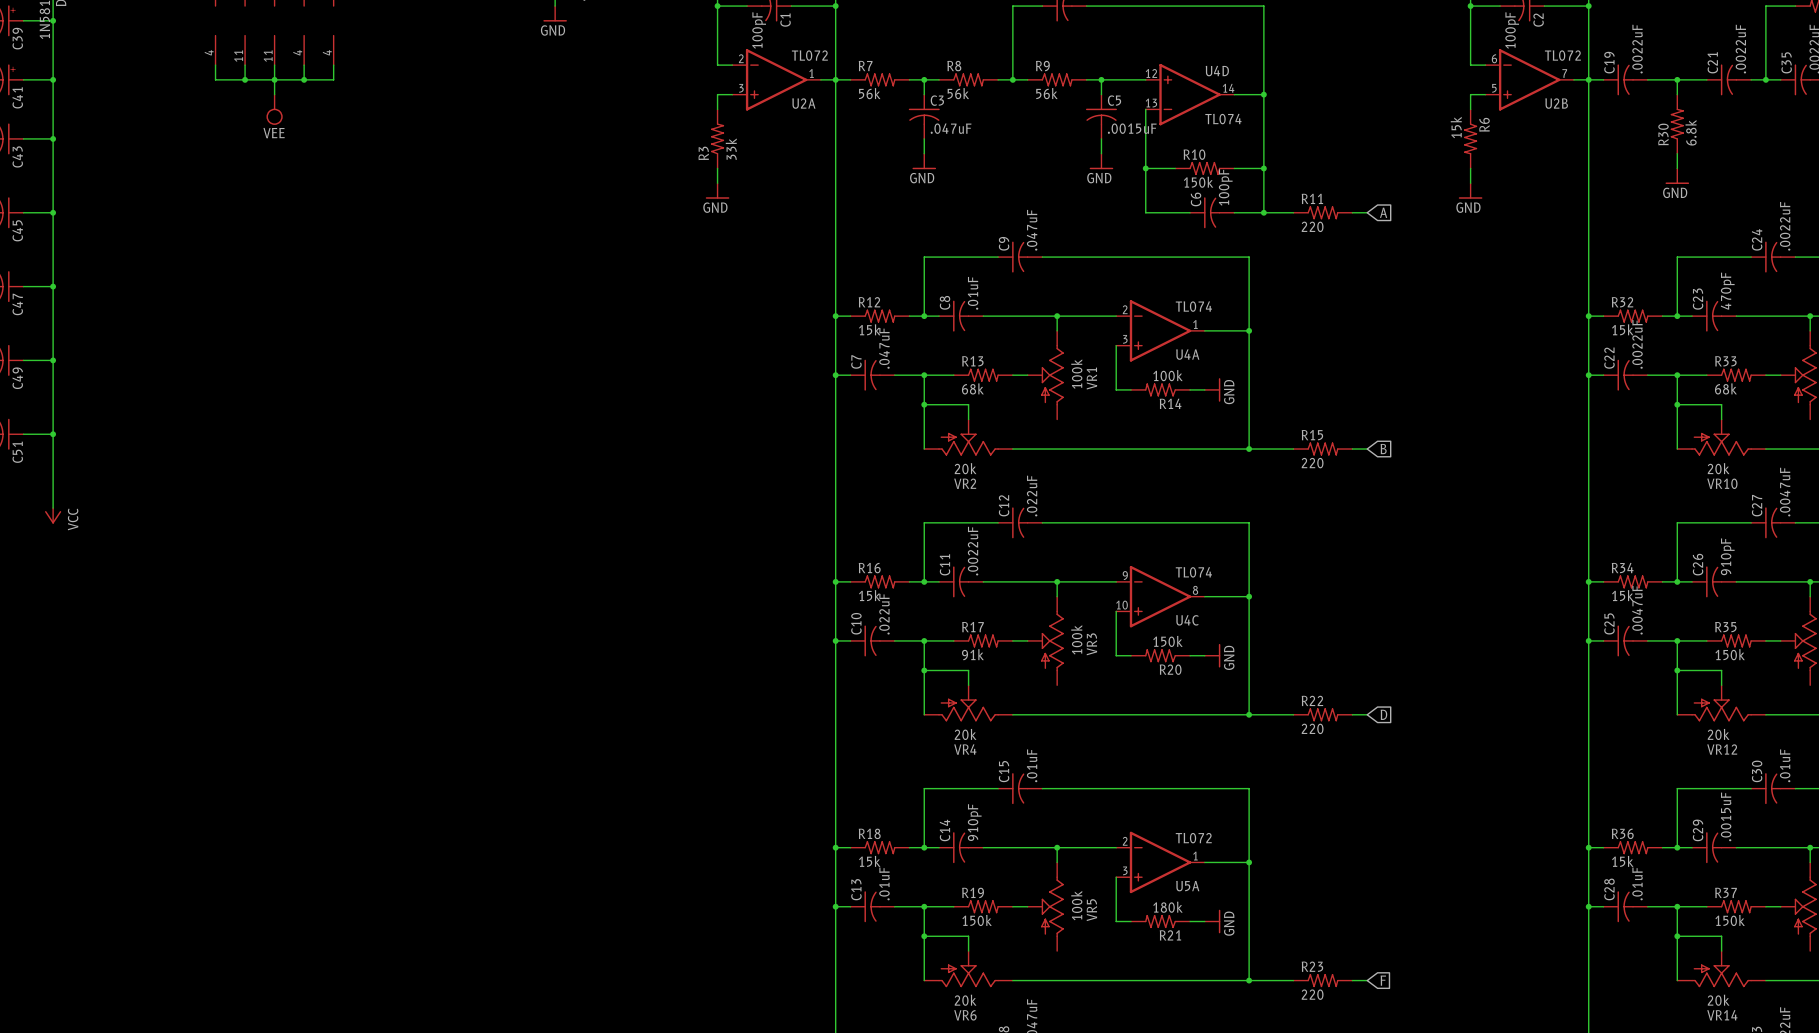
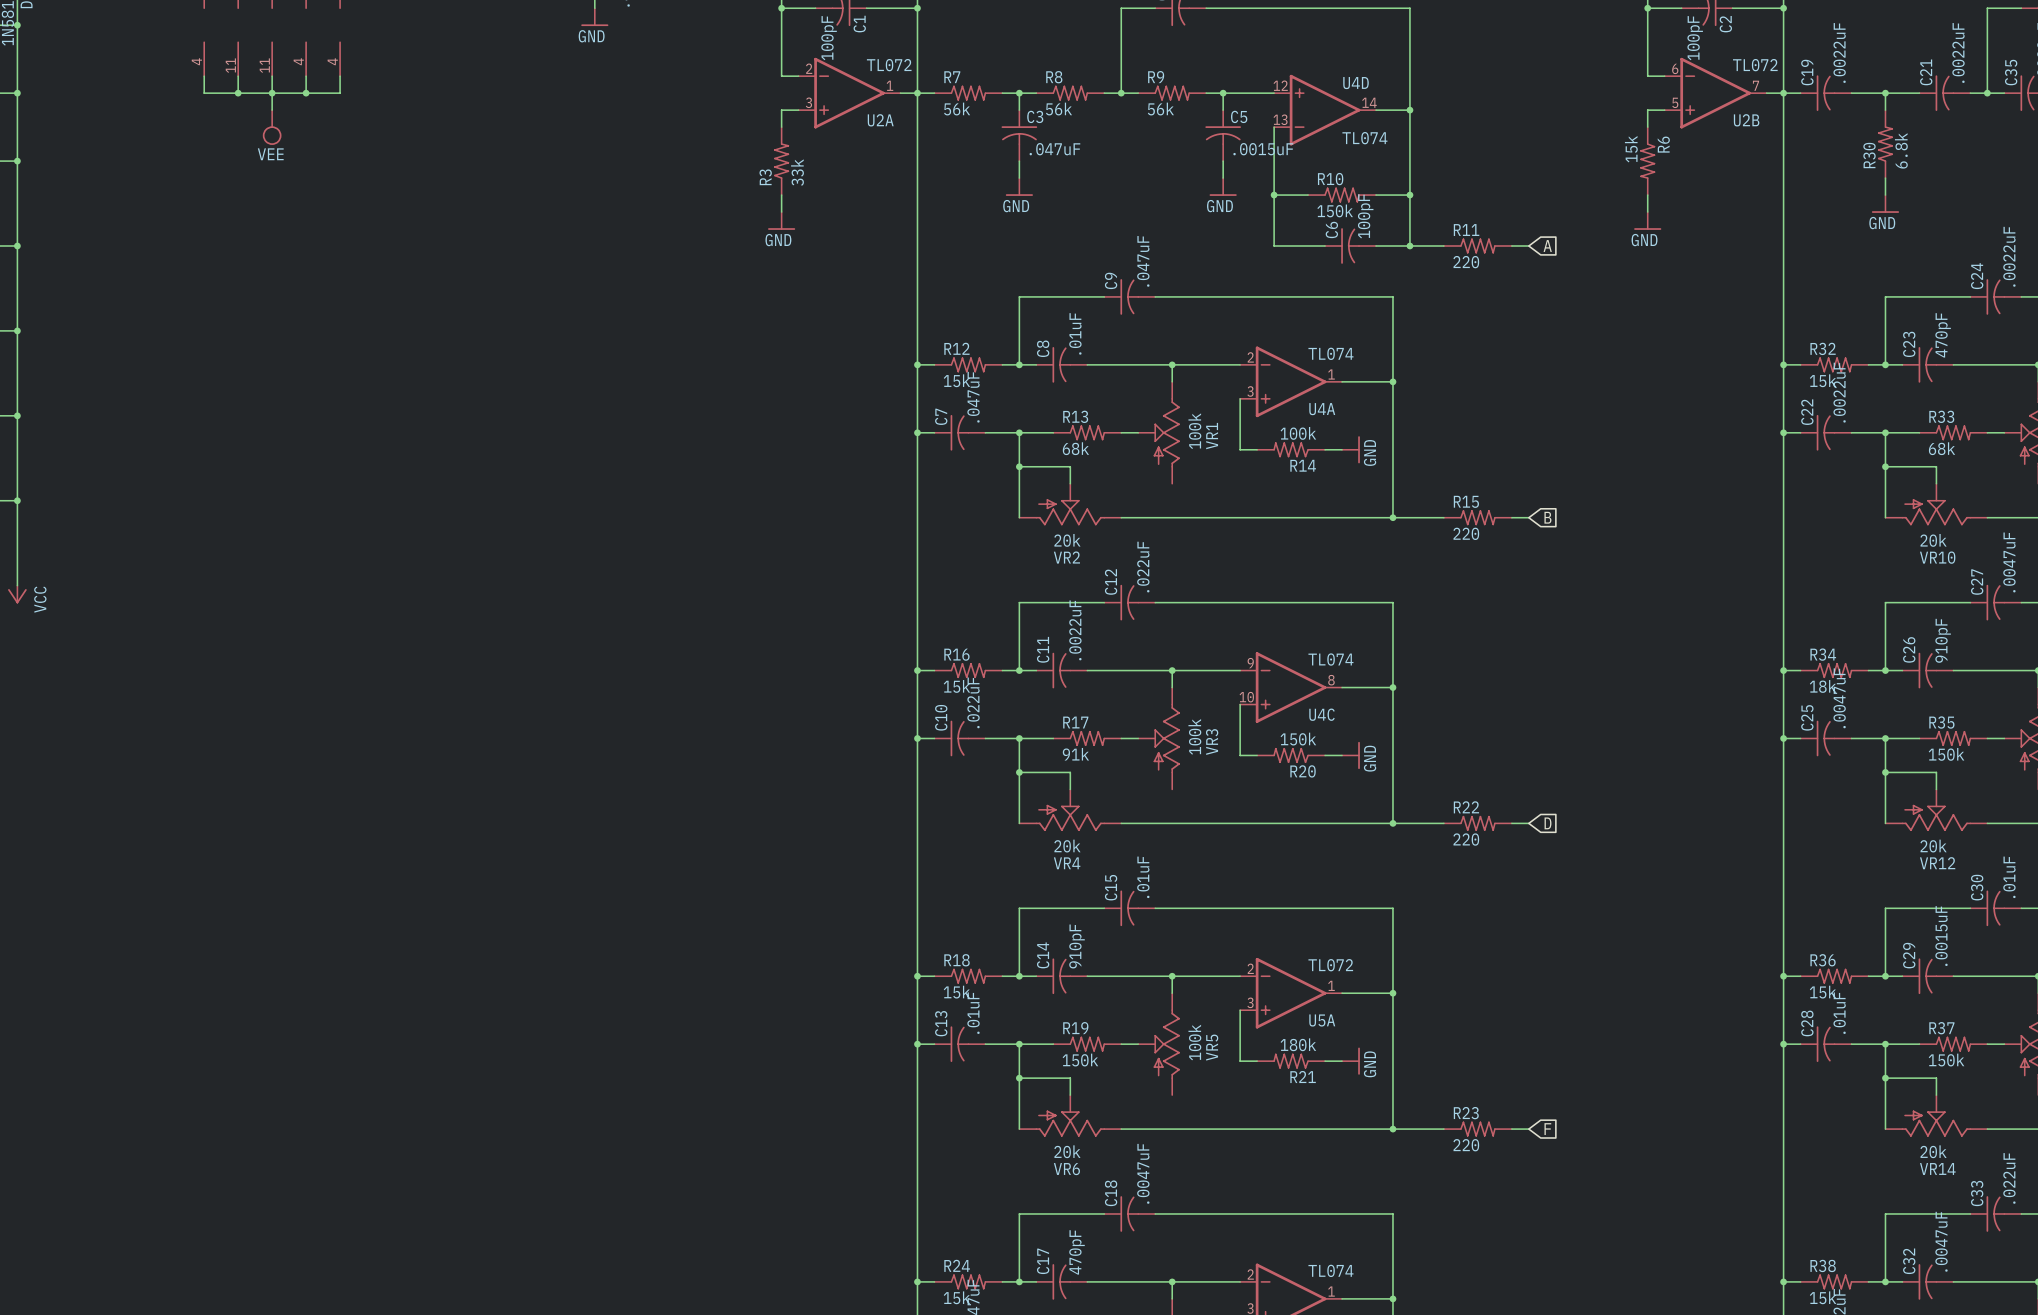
R34 value: 15k (1622, 595) -> 18k (1823, 686)

